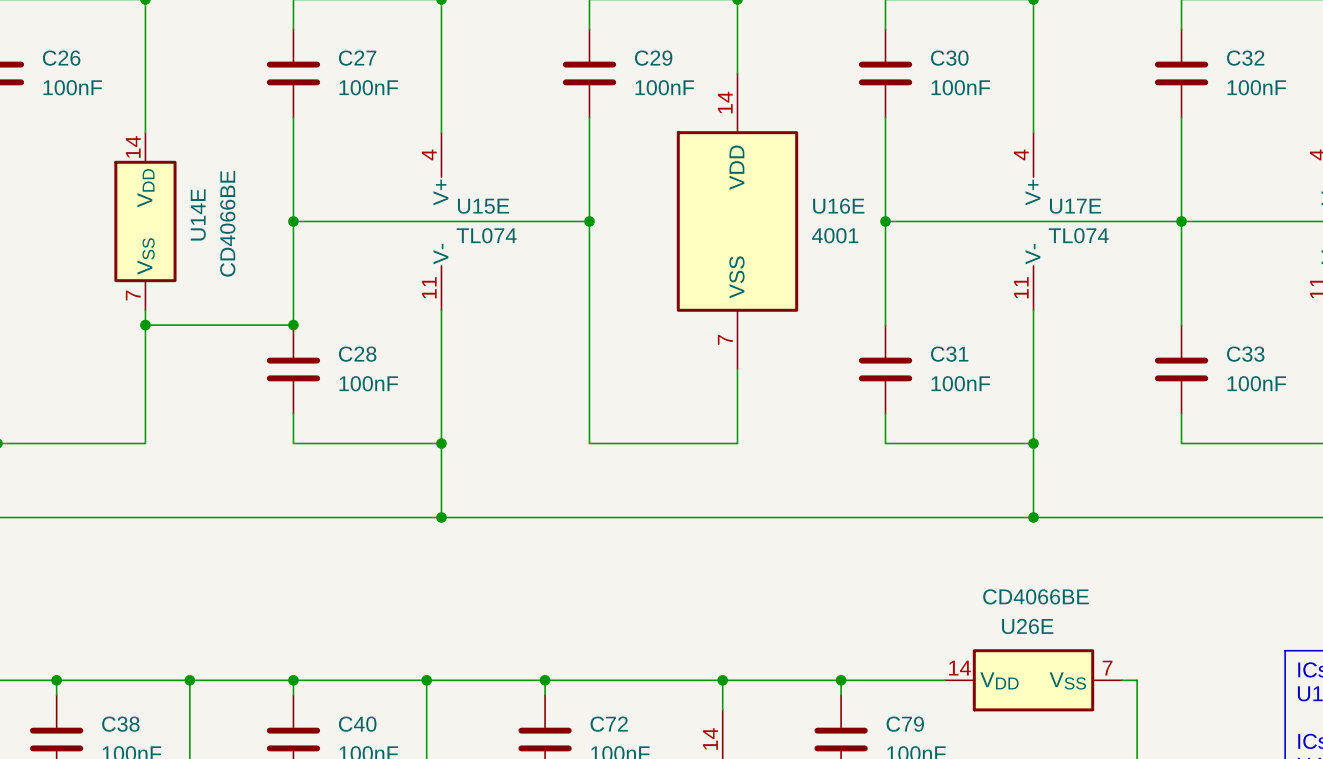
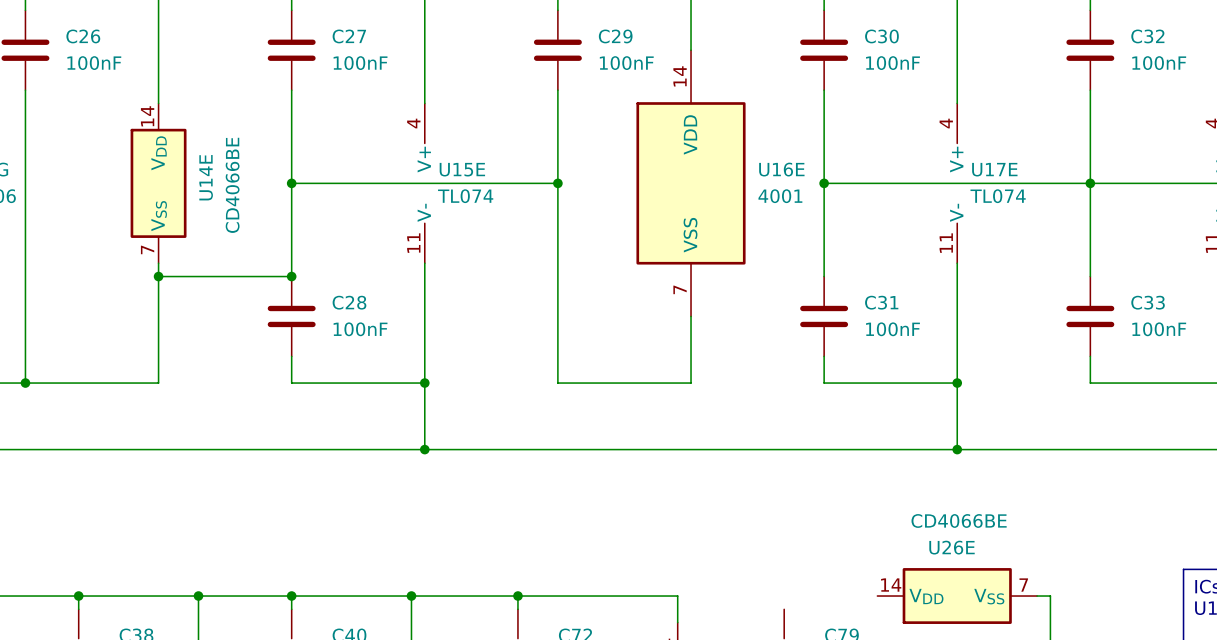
wire: (722, 680) (944, 680) -> none
junction: (722, 680) -> none
wire: (841, 680) (841, 695) -> none
junction: (841, 680) -> none

